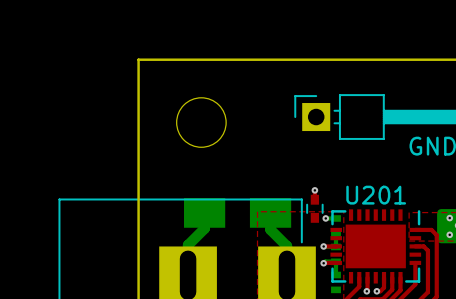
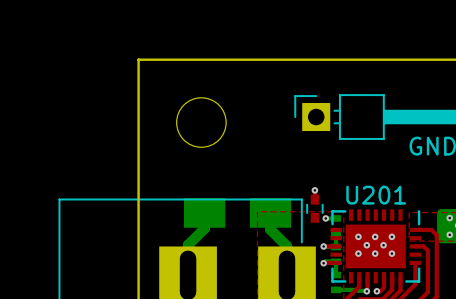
via: none -> (358, 236)
via: none -> (375, 236)
via: none -> (391, 236)
via: none -> (366, 245)
via: none -> (383, 245)
via: none -> (358, 253)
via: none -> (375, 253)
via: none -> (391, 253)
bottom track: none -> (335, 289) (366, 291)

